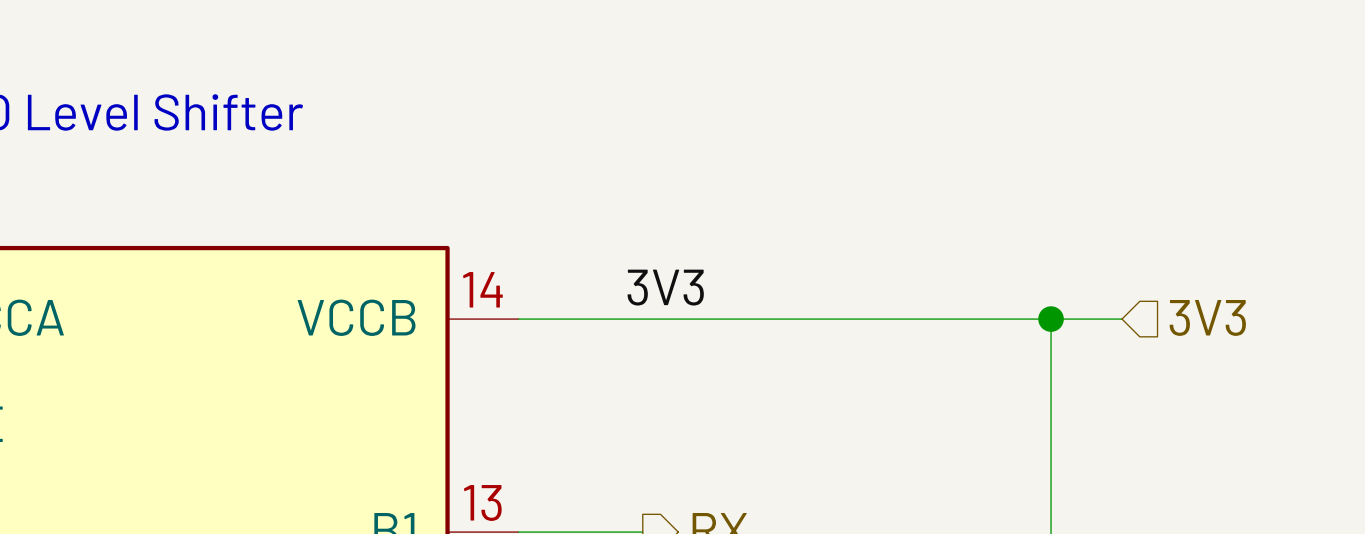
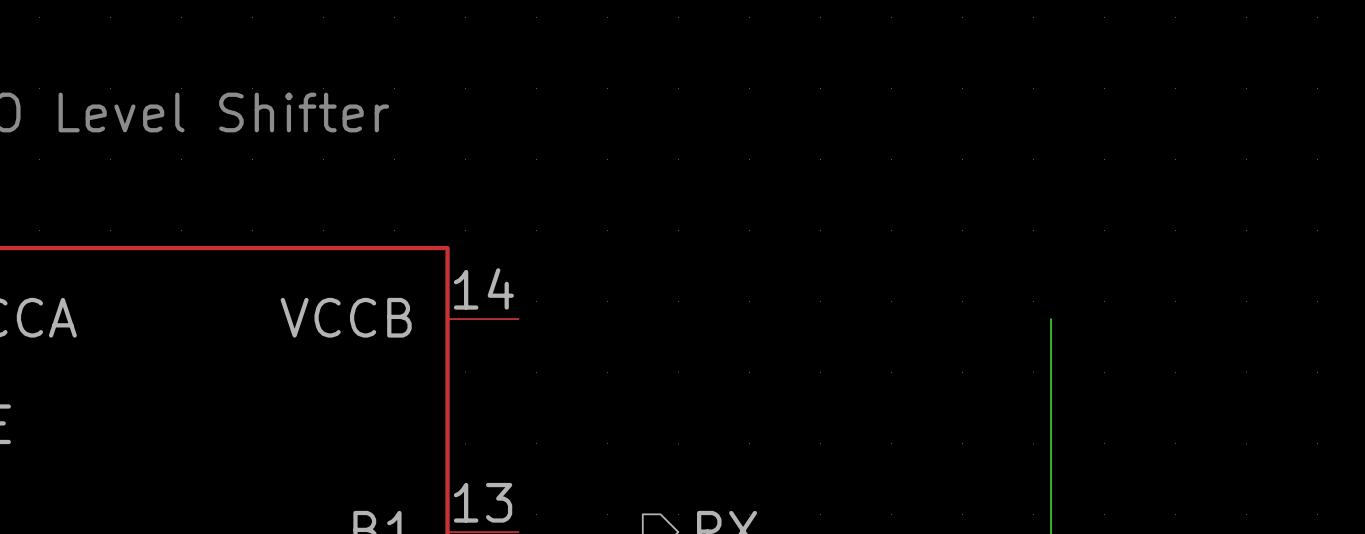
label: 3V3 (665, 287) -> none
hierarchical label: 3V3 (1207, 317) -> none
wire: (518, 319) (1122, 319) -> none
junction: (1051, 319) -> none
wire: (518, 532) (642, 532) -> none

